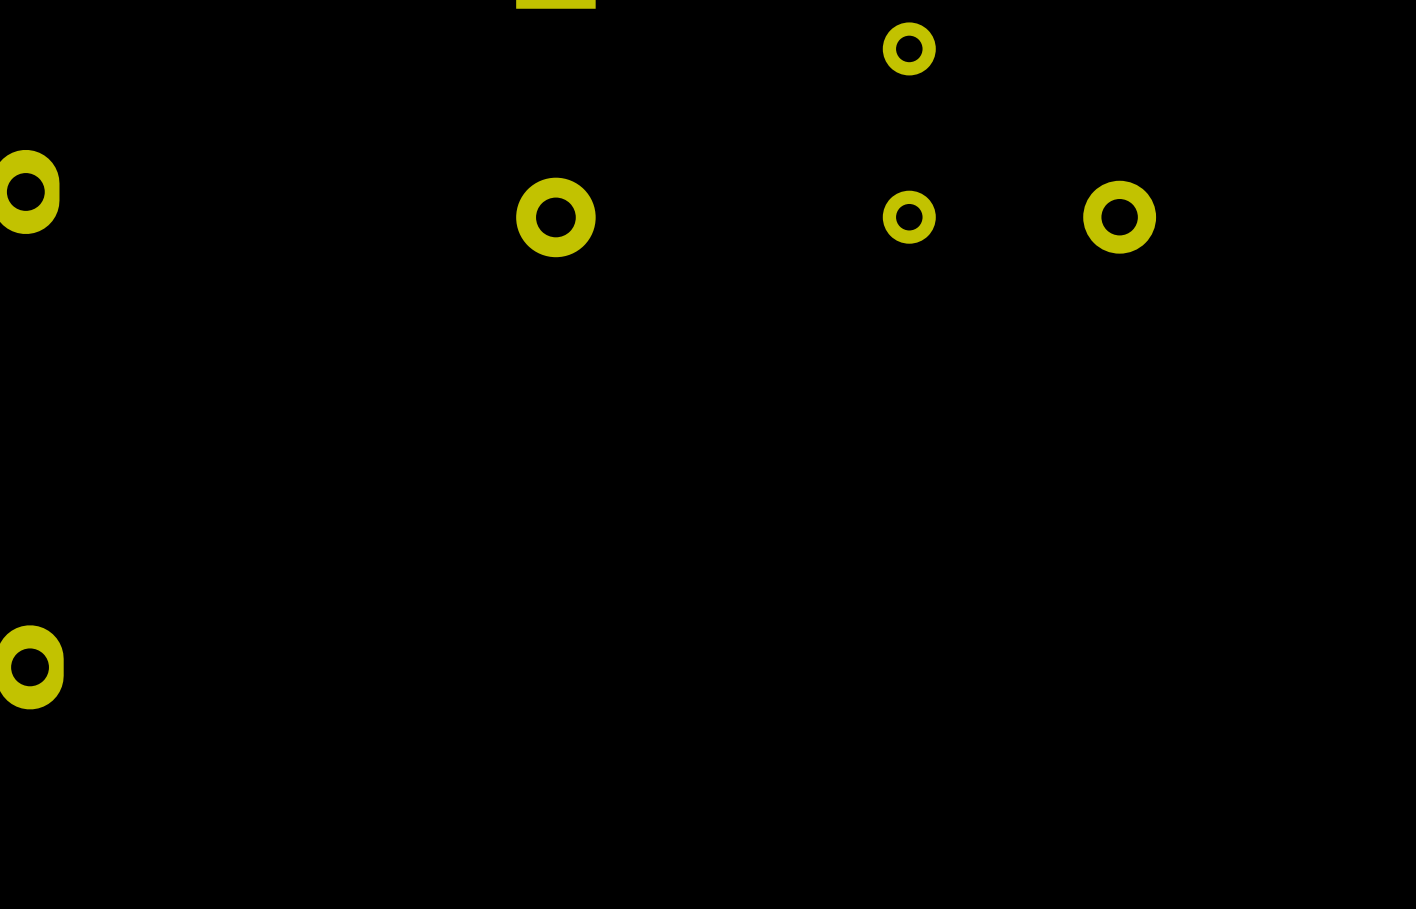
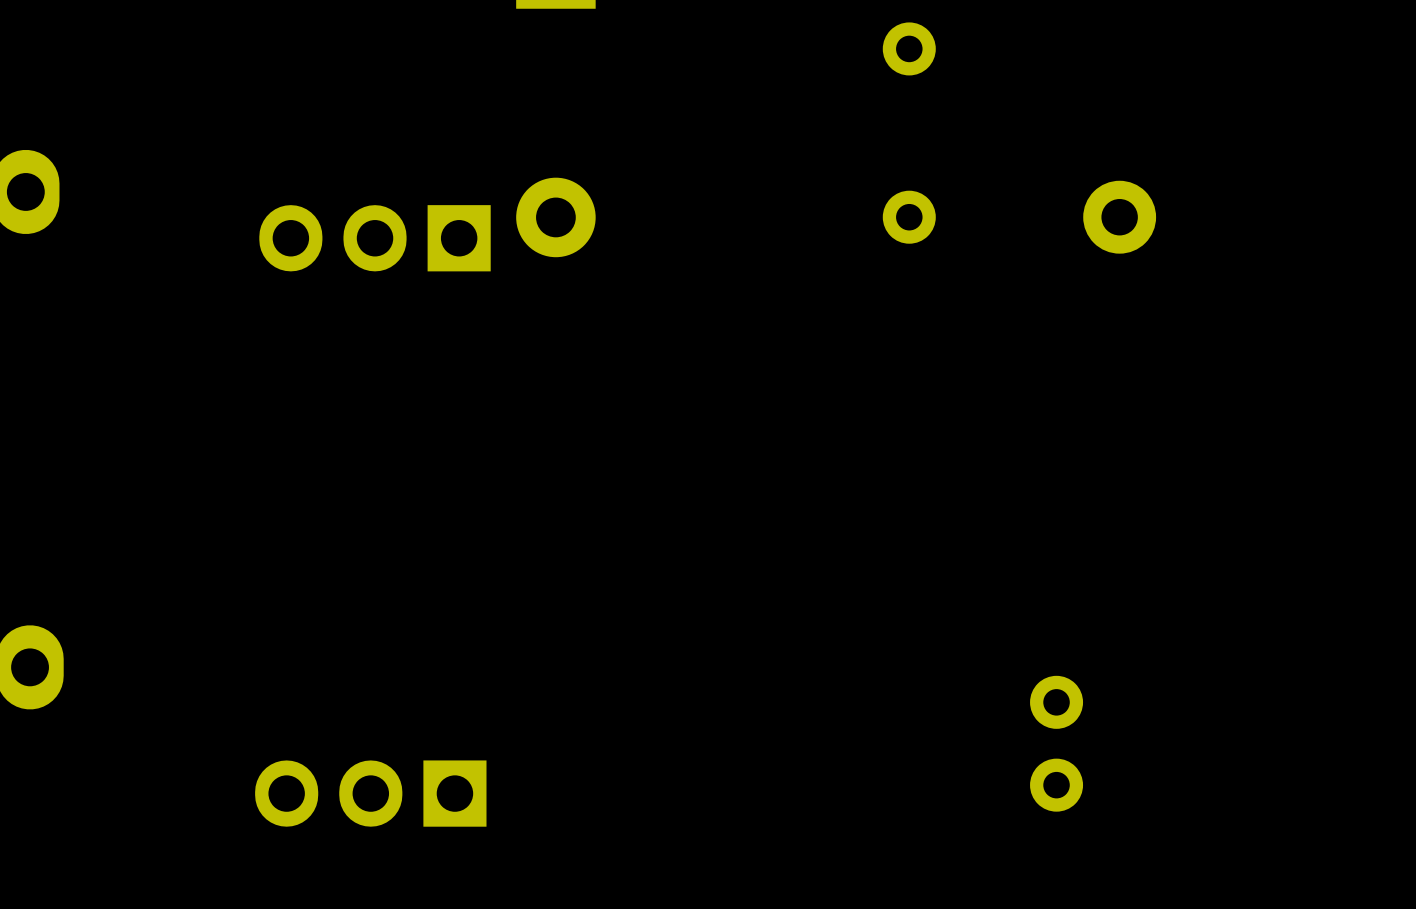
part: none -> (375, 238)
part: none -> (1056, 743)
part: none -> (370, 793)

